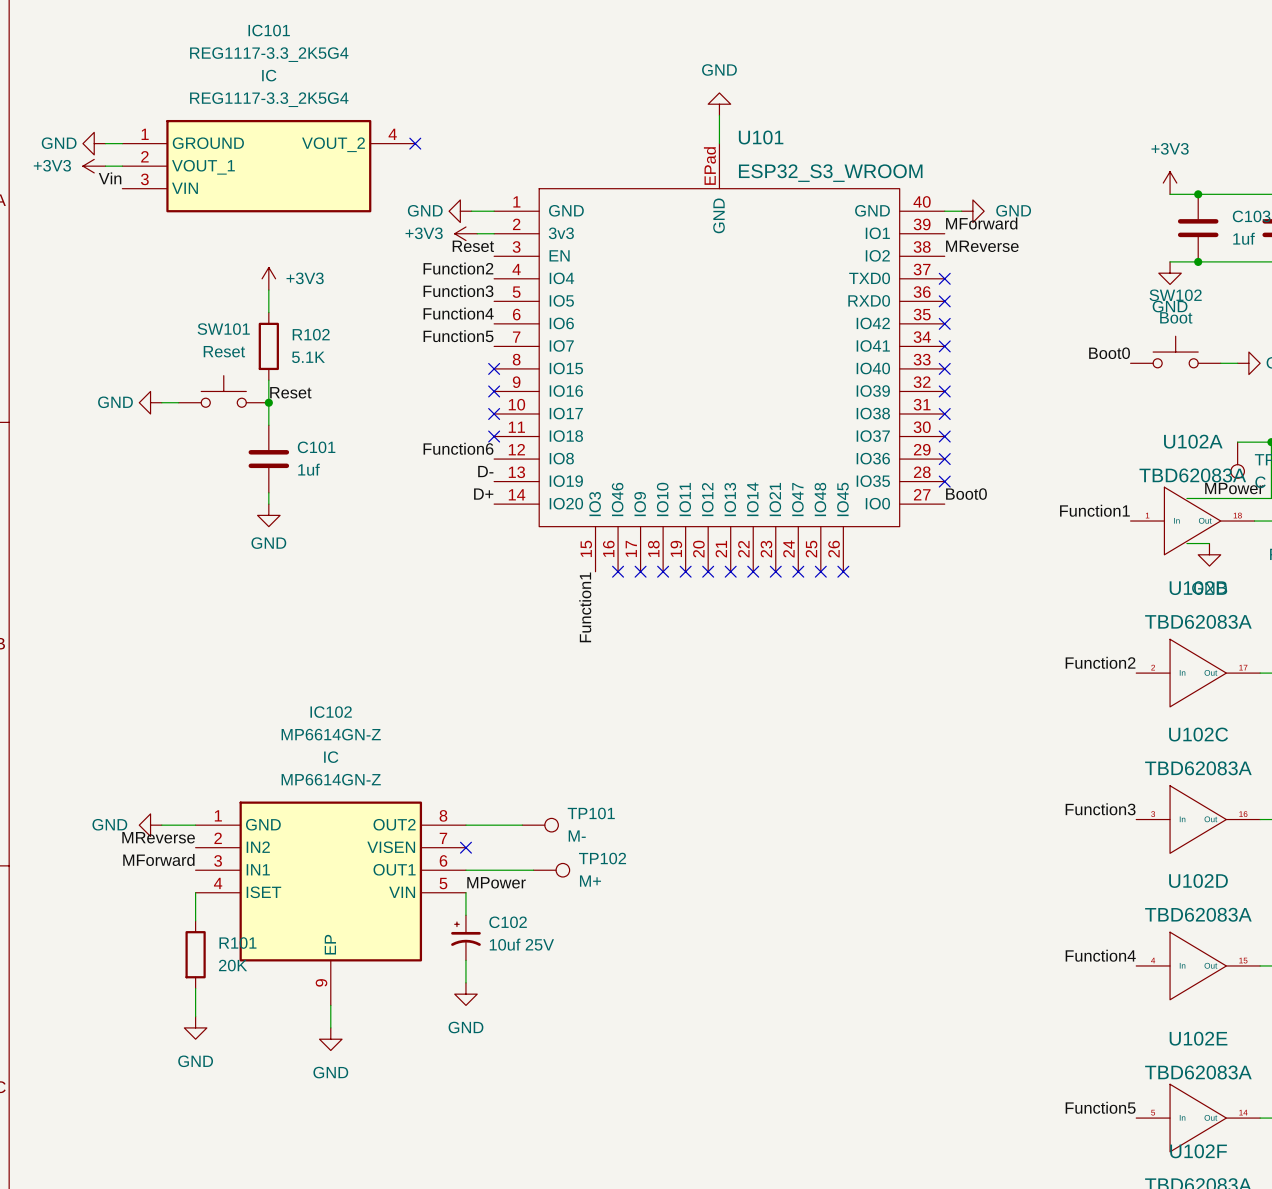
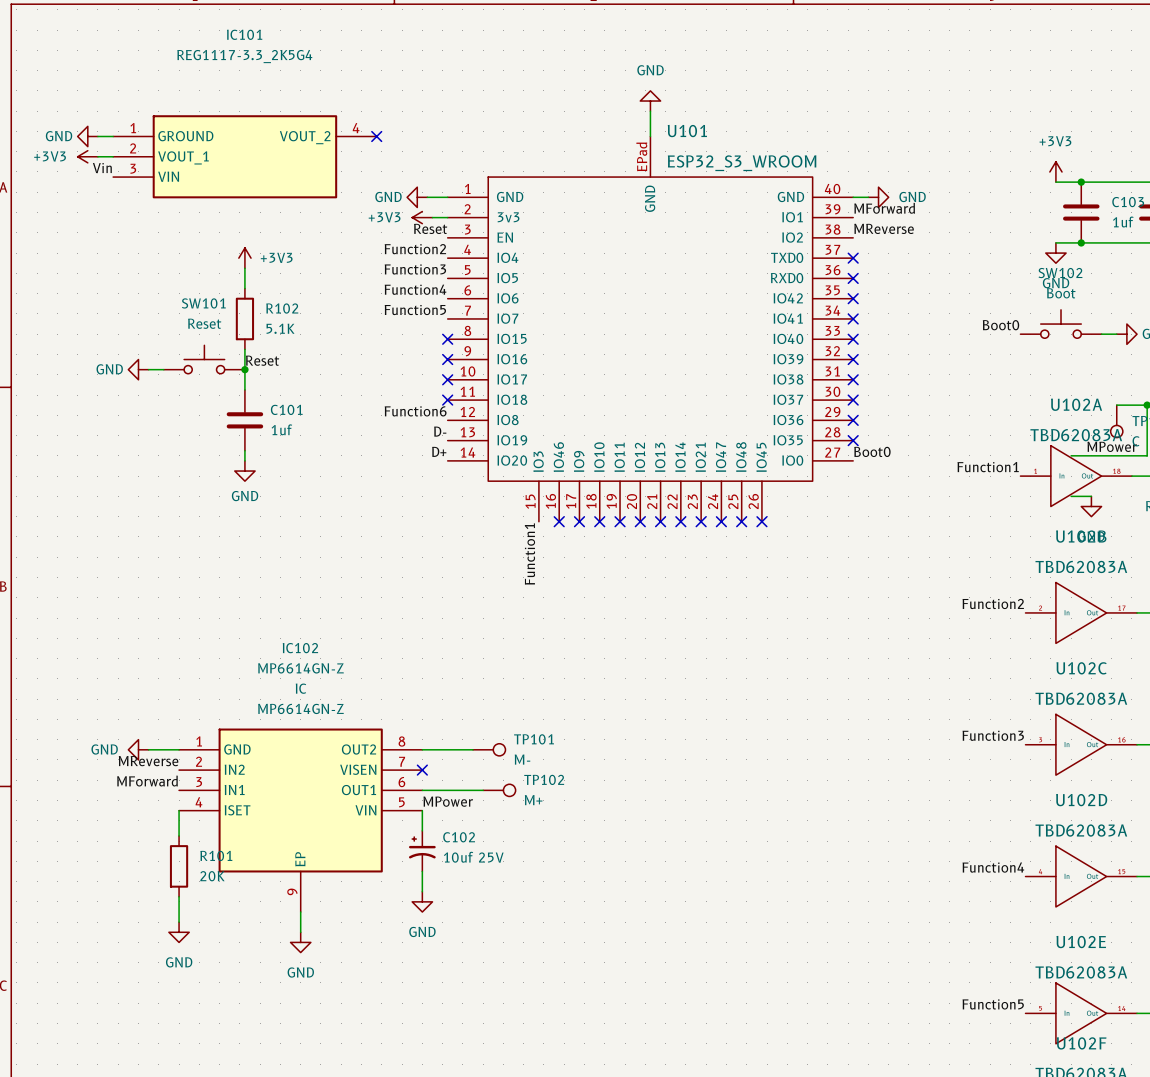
IC101 text: IC (269, 75) -> none
IC101 text: REG1117-3.3_2K5G4 (269, 99) -> none

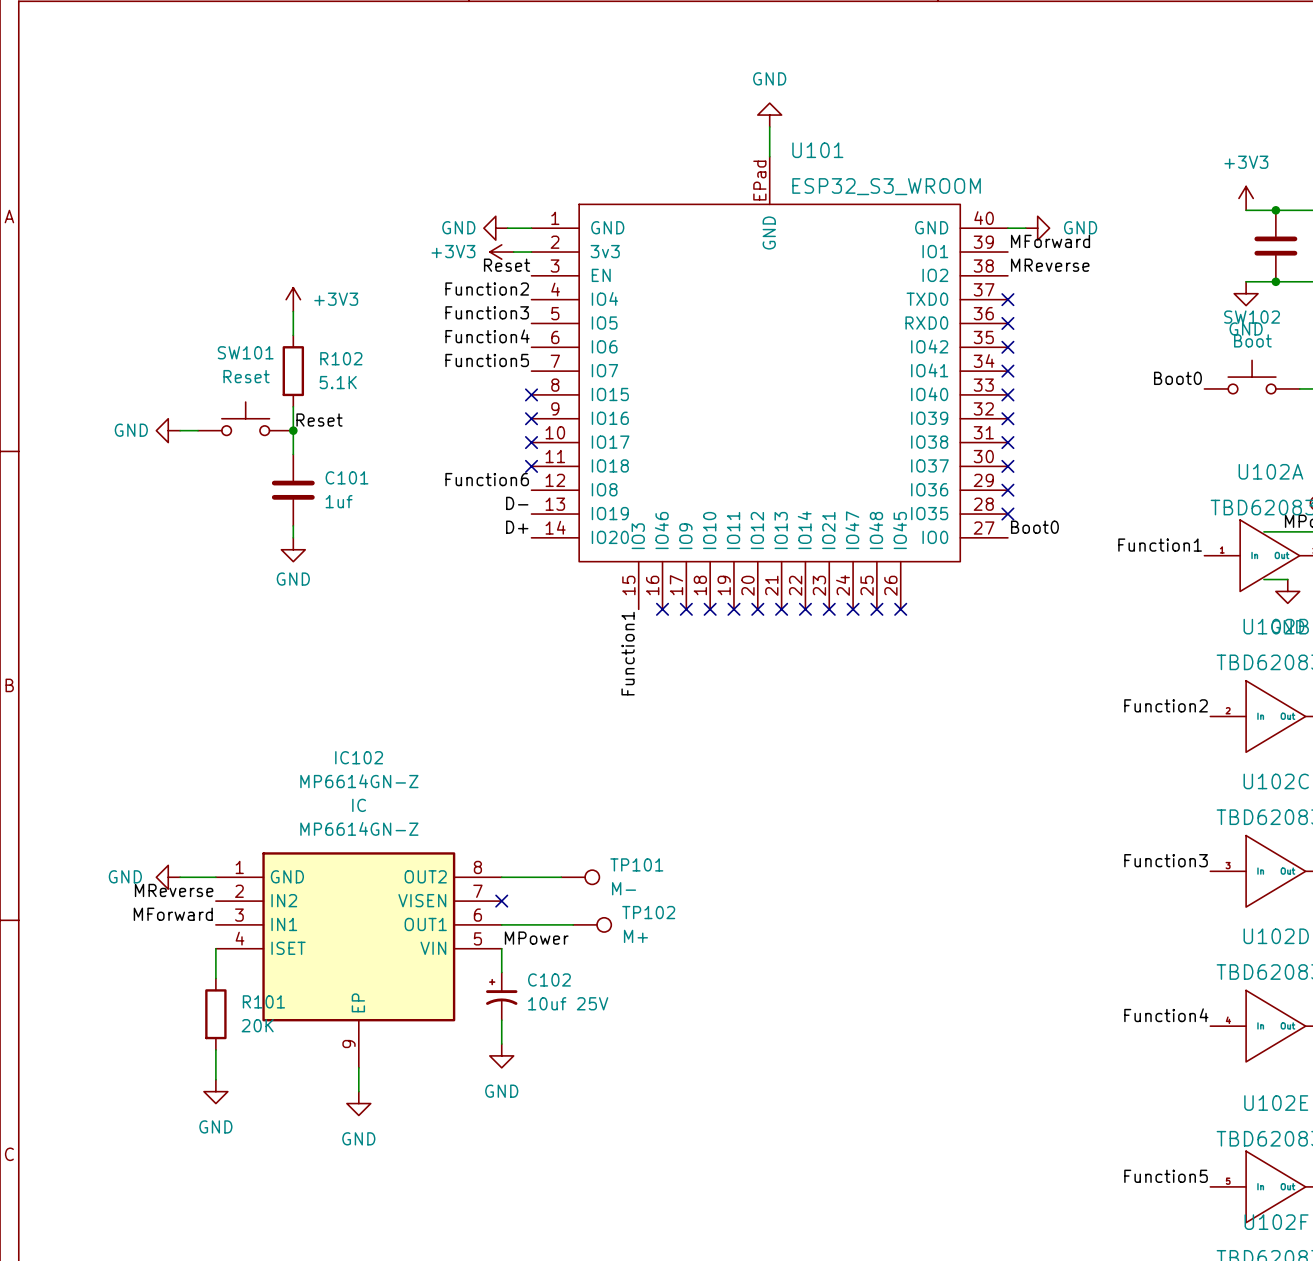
power symbol: GND (87, 136) -> none
wire: (97, 136) (113, 136) -> none
no-connect mark: (376, 136) -> none
power symbol: +3V3 (87, 156) -> none
wire: (97, 156) (113, 156) -> none
IC101: REG1117-3.3_2K5G4 (244, 156) -> none
label: Vin (102, 168) -> none

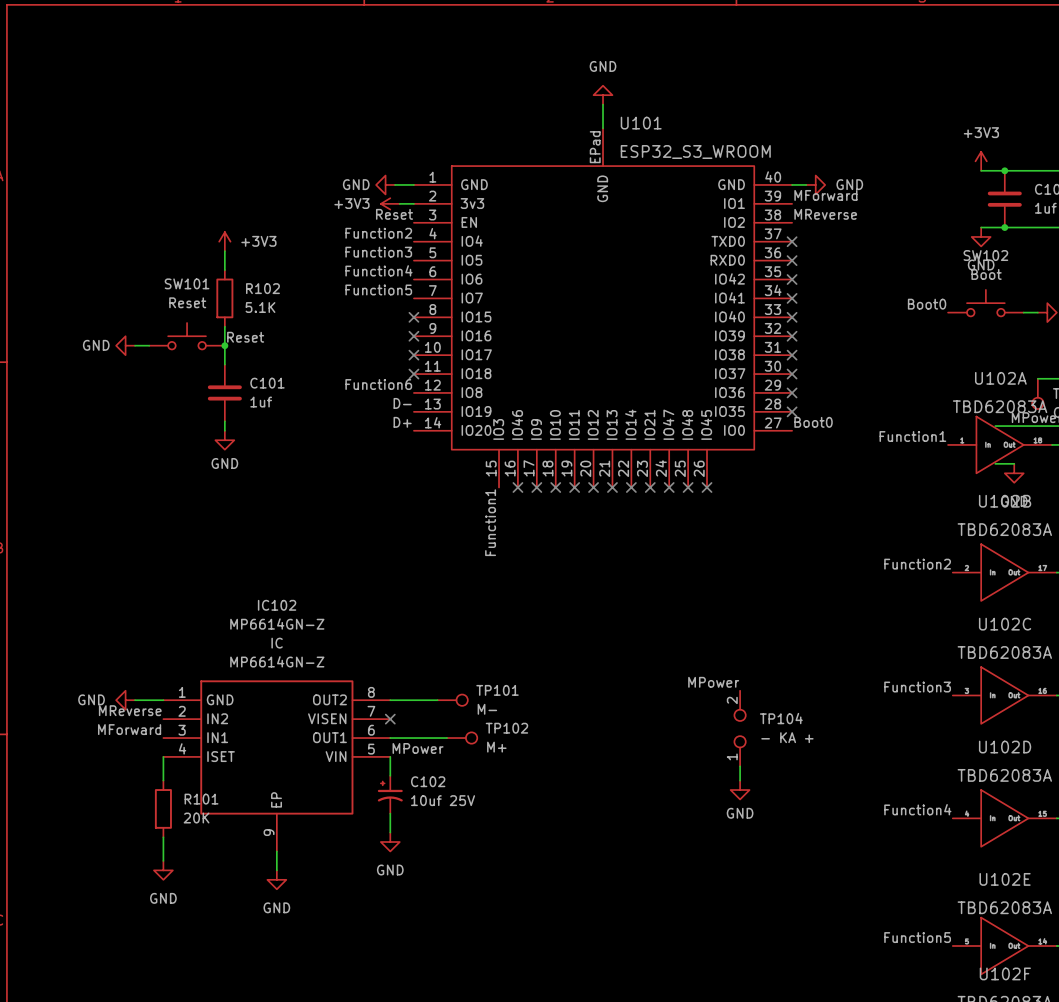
label: none -> MPower (713, 682)
TP104: none -> - KA + (740, 728)
wire: none -> (740, 766) (740, 780)
power symbol: none -> GND (740, 790)

